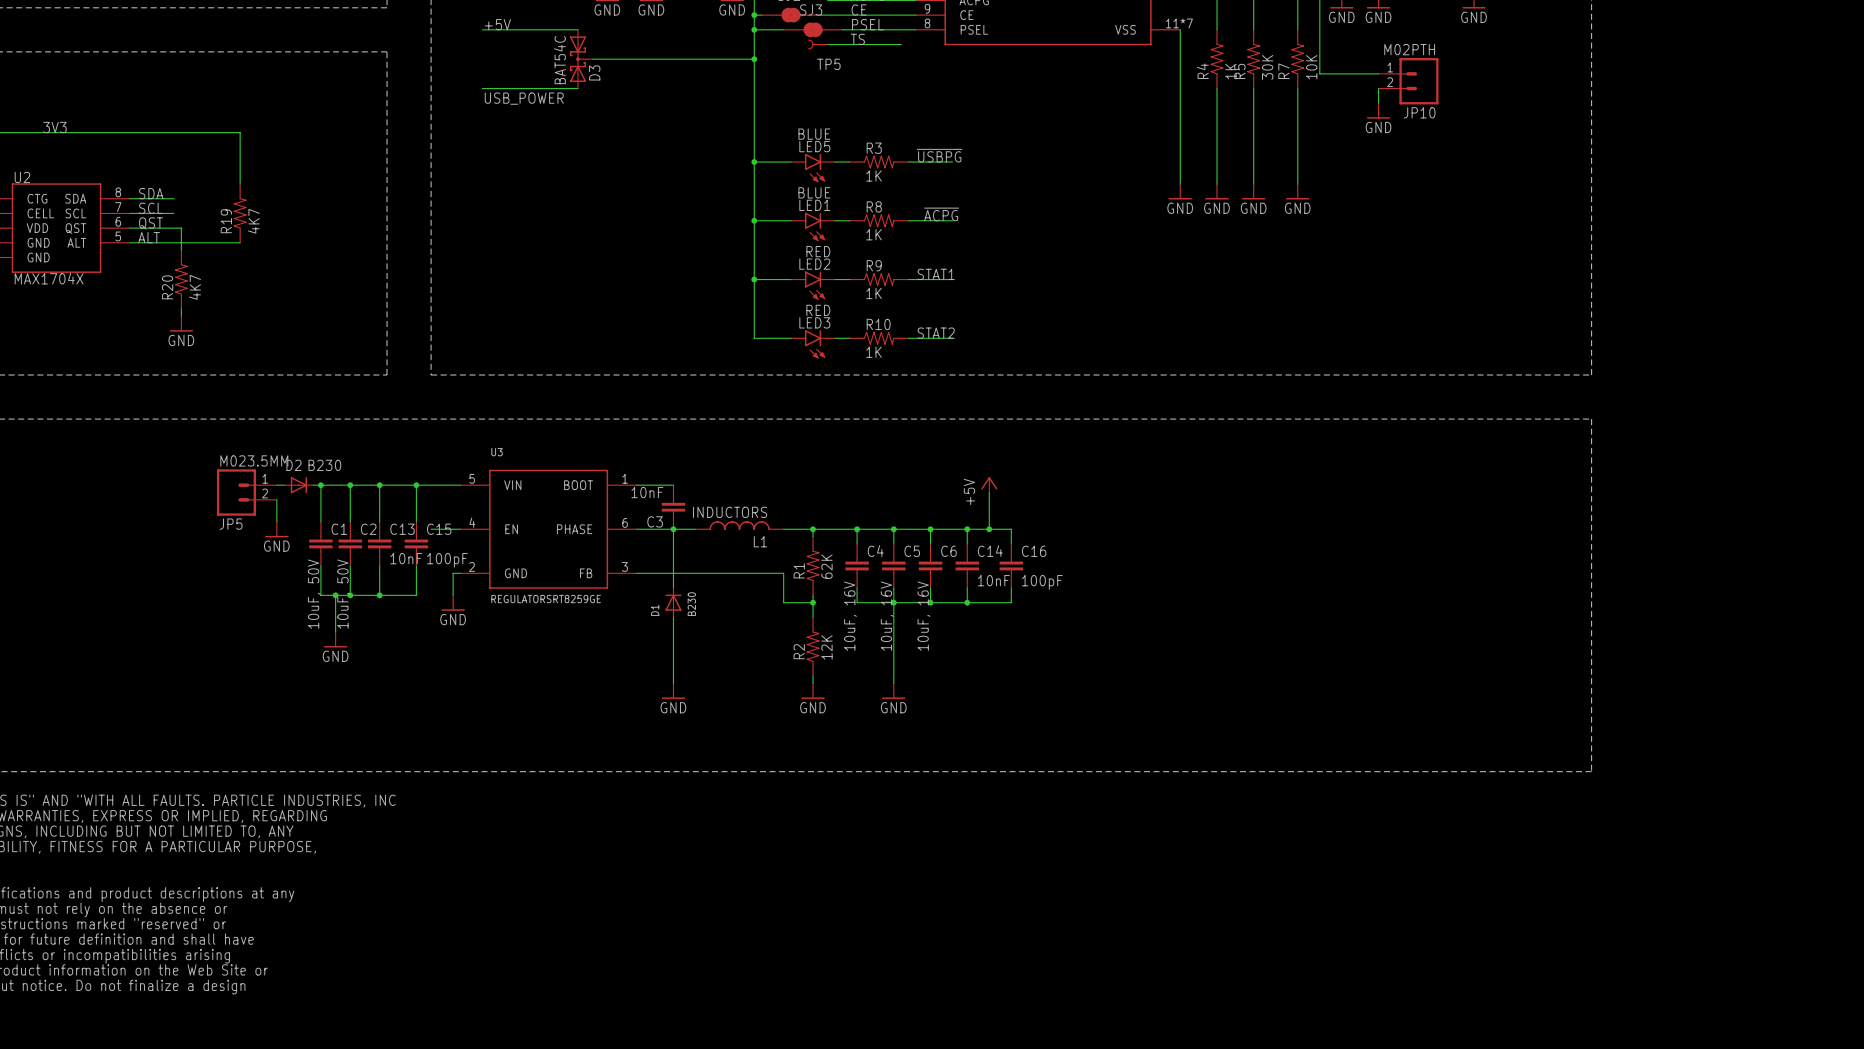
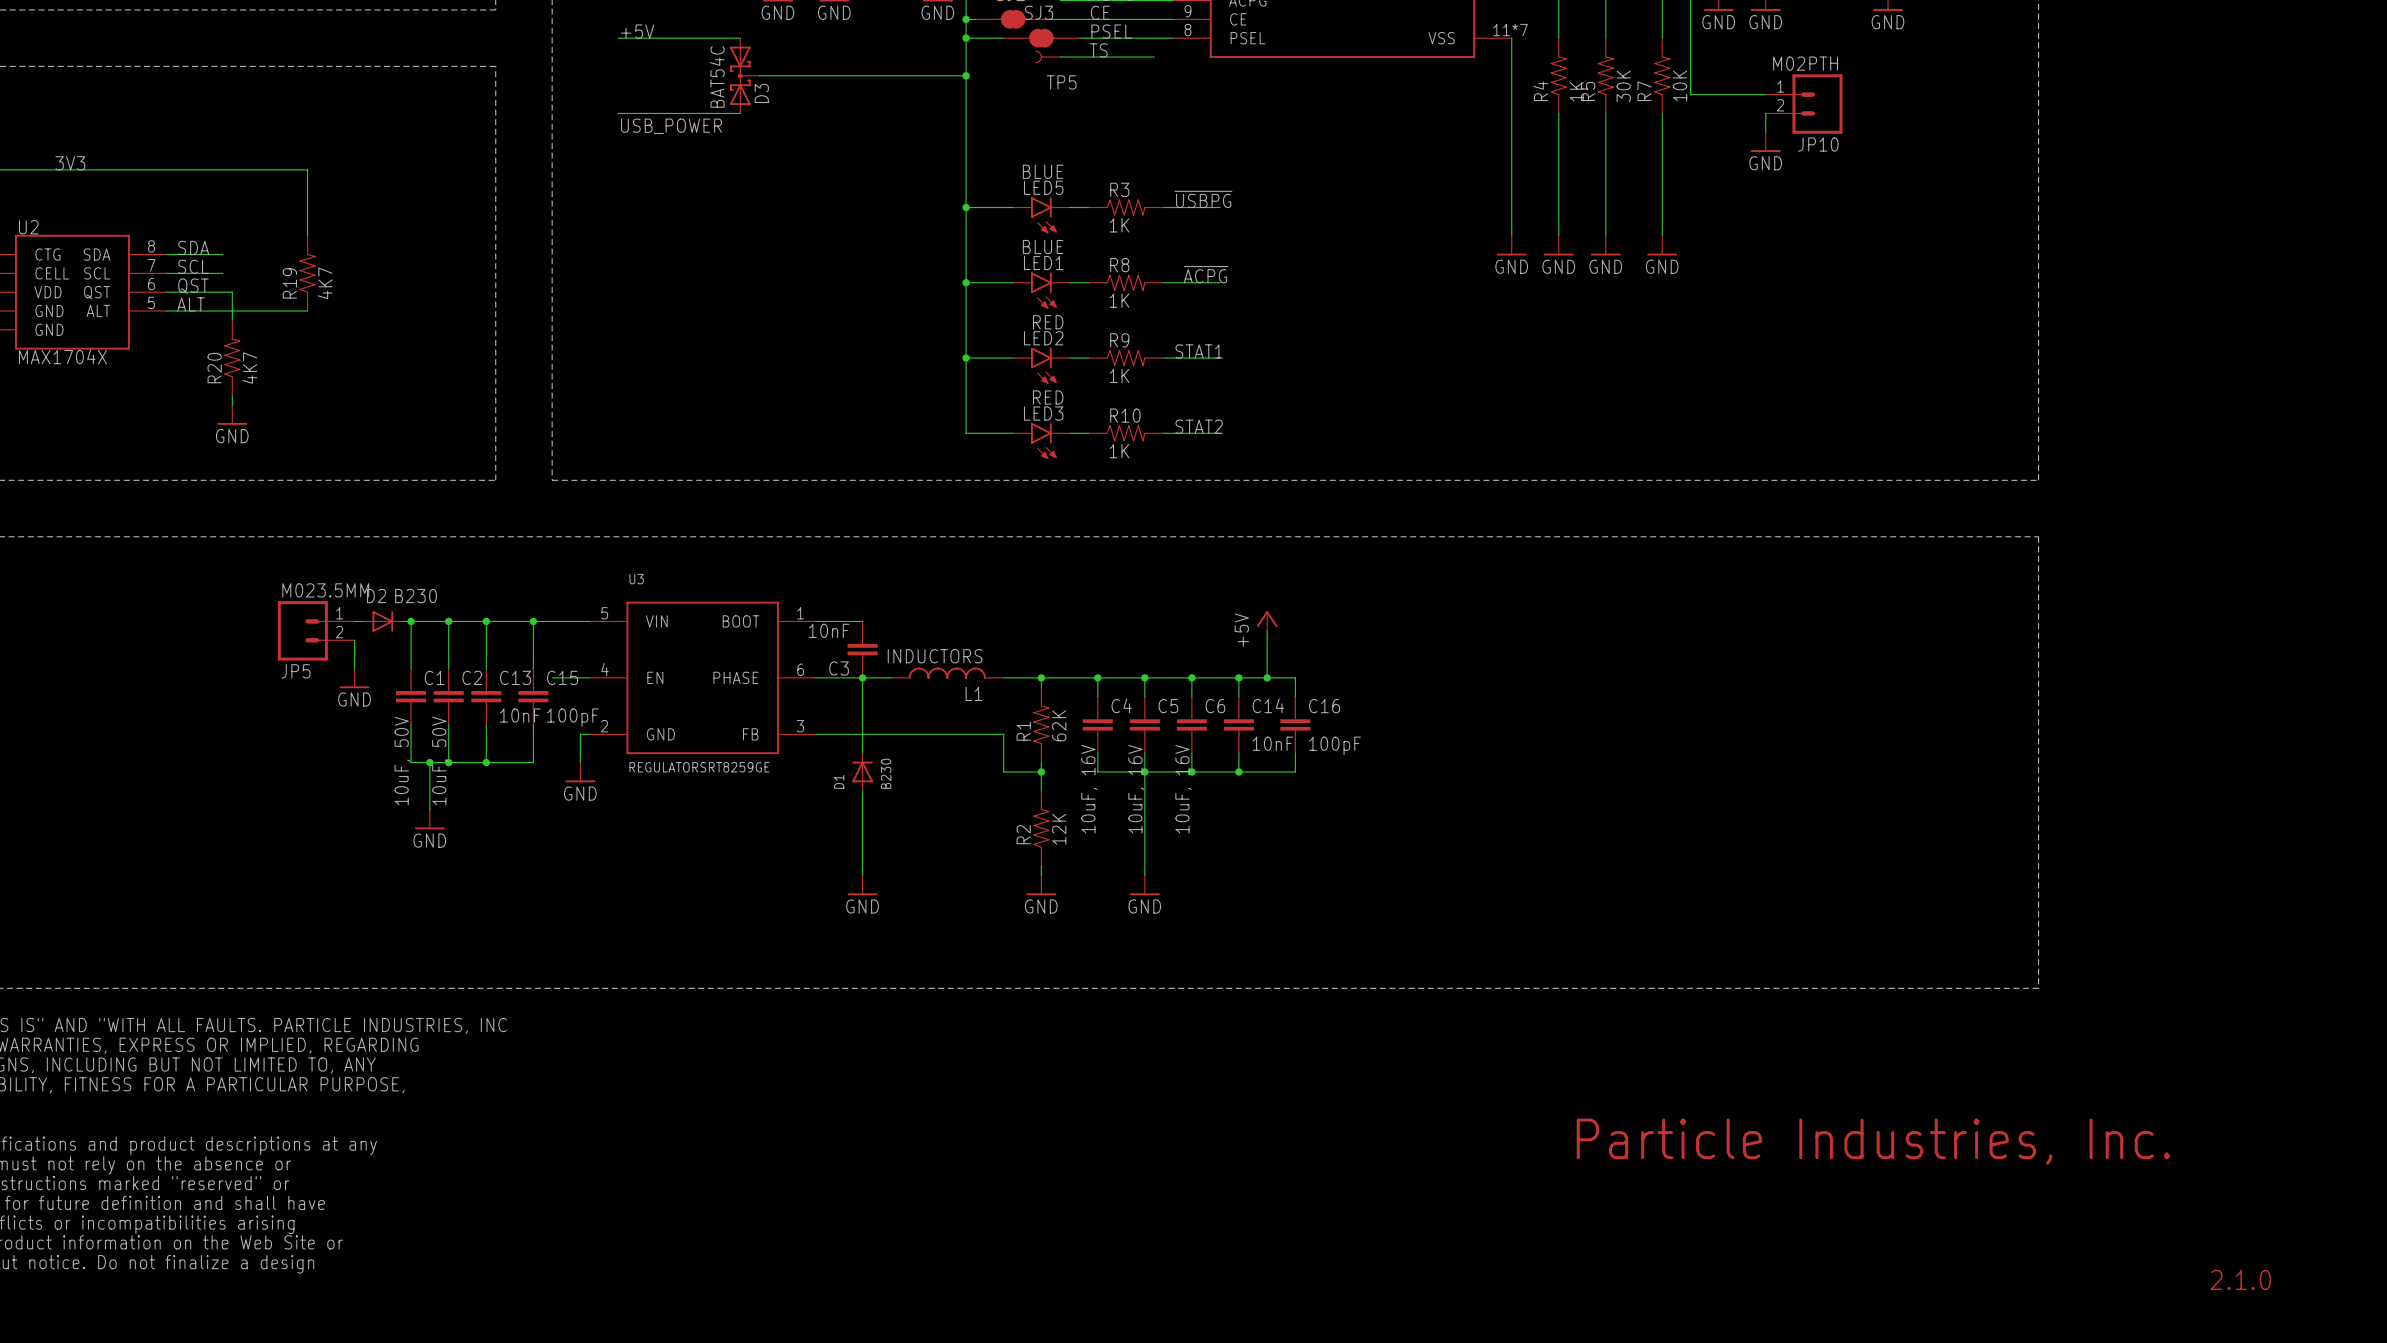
text: none -> Particle Industries, Inc. (1873, 1141)
text: none -> 2.1.0 (2240, 1279)

